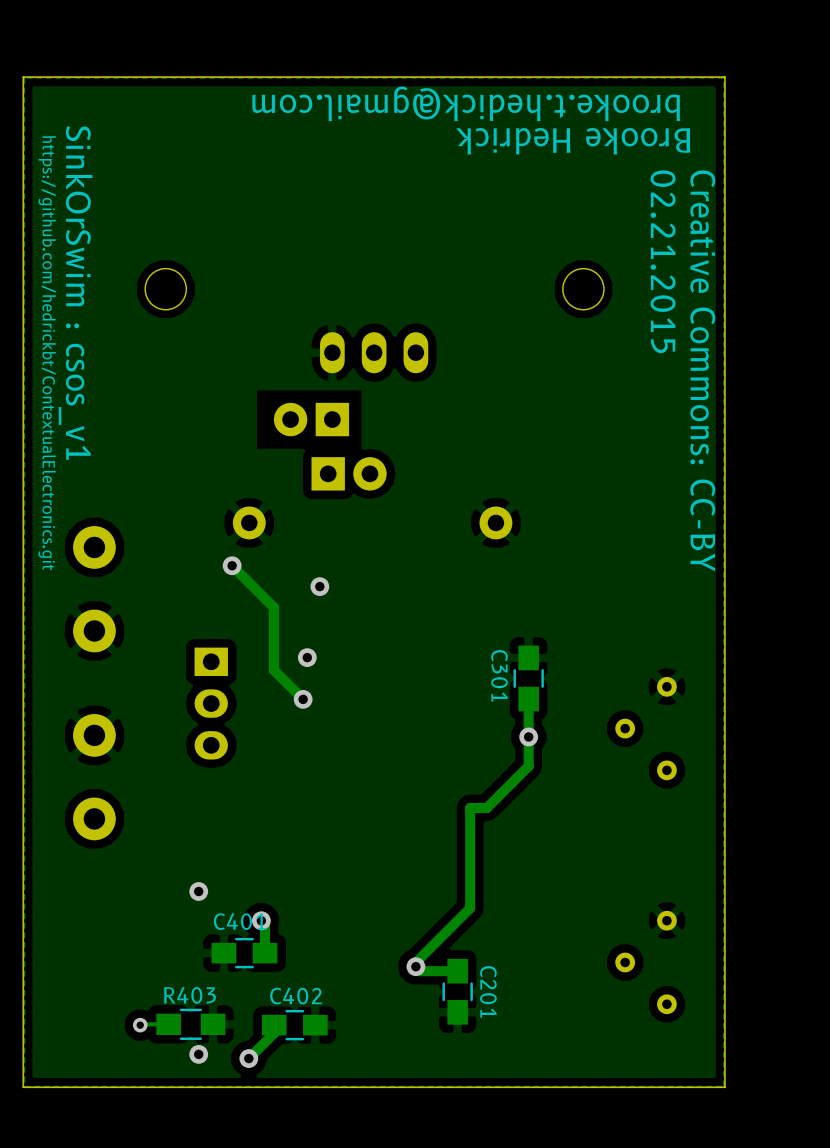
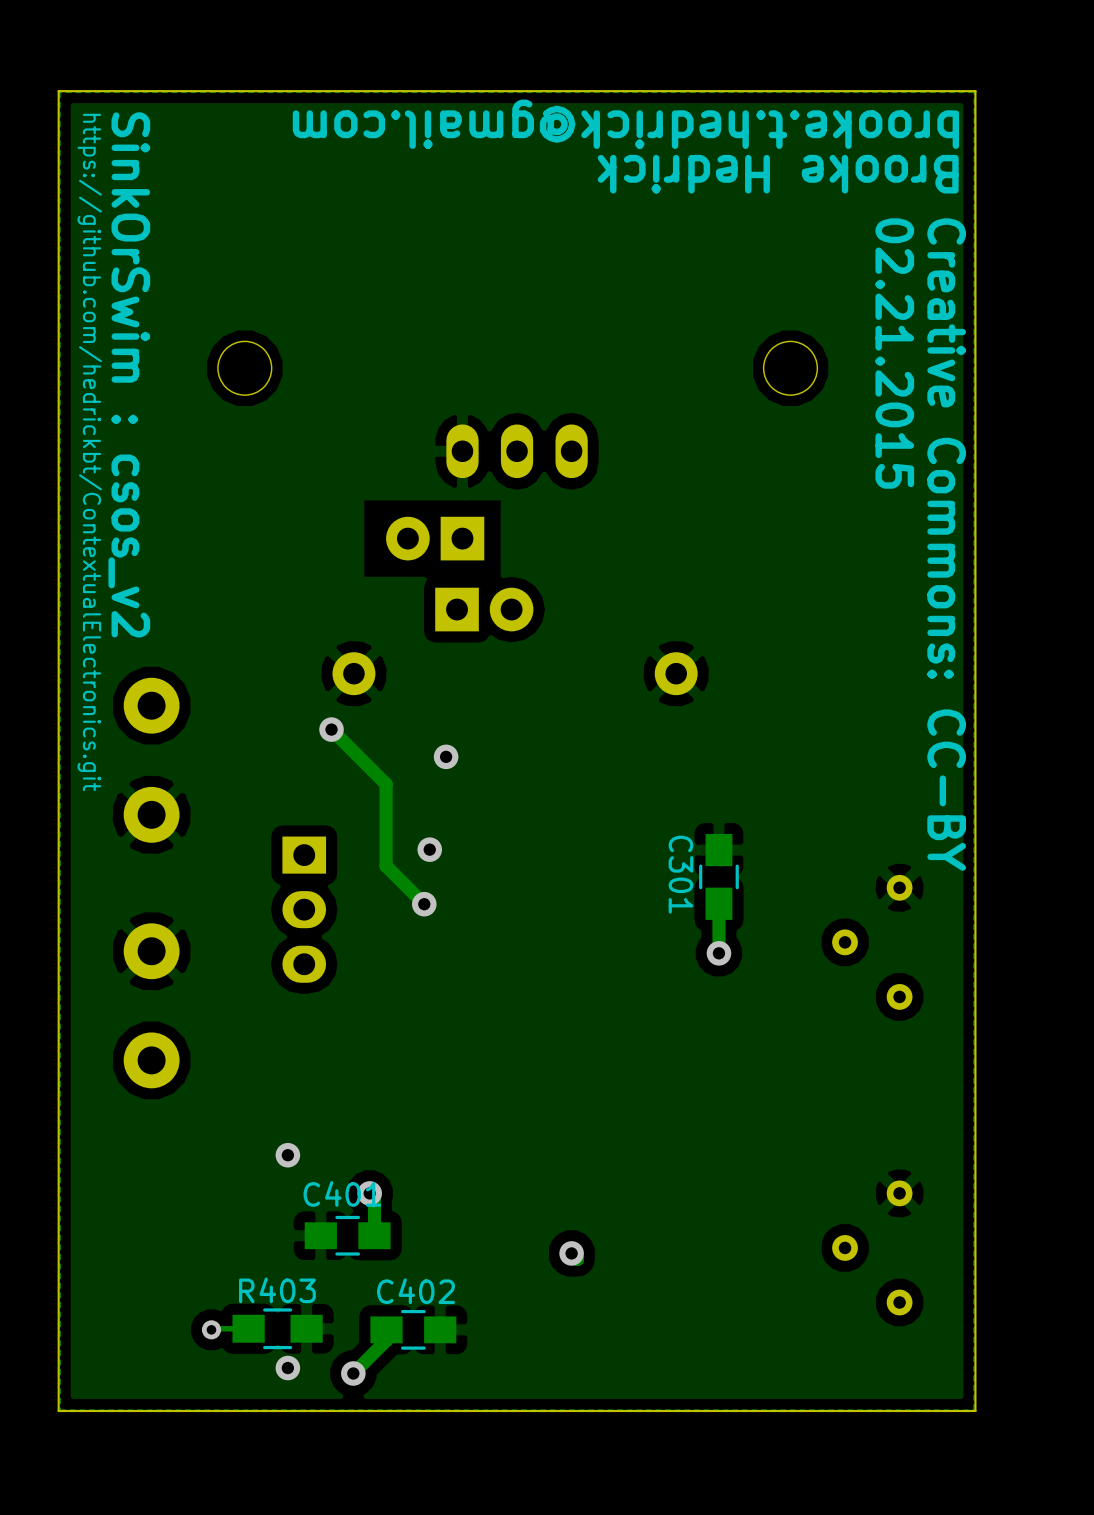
text: brooke.t.hedick@gmail.com (466, 103) -> brooke.t.hedrick@gmail.com (625, 124)
text: SinkOrSwim : csos_v1 (75, 292) -> SinkOrSwim : csos_v2 (129, 374)
track: (528, 736) (528, 766) (486, 807) (470, 807) (470, 908) (415, 962) (415, 966) -> none
track: (457, 971) (420, 971) -> none
C201: (457, 991) -> none

